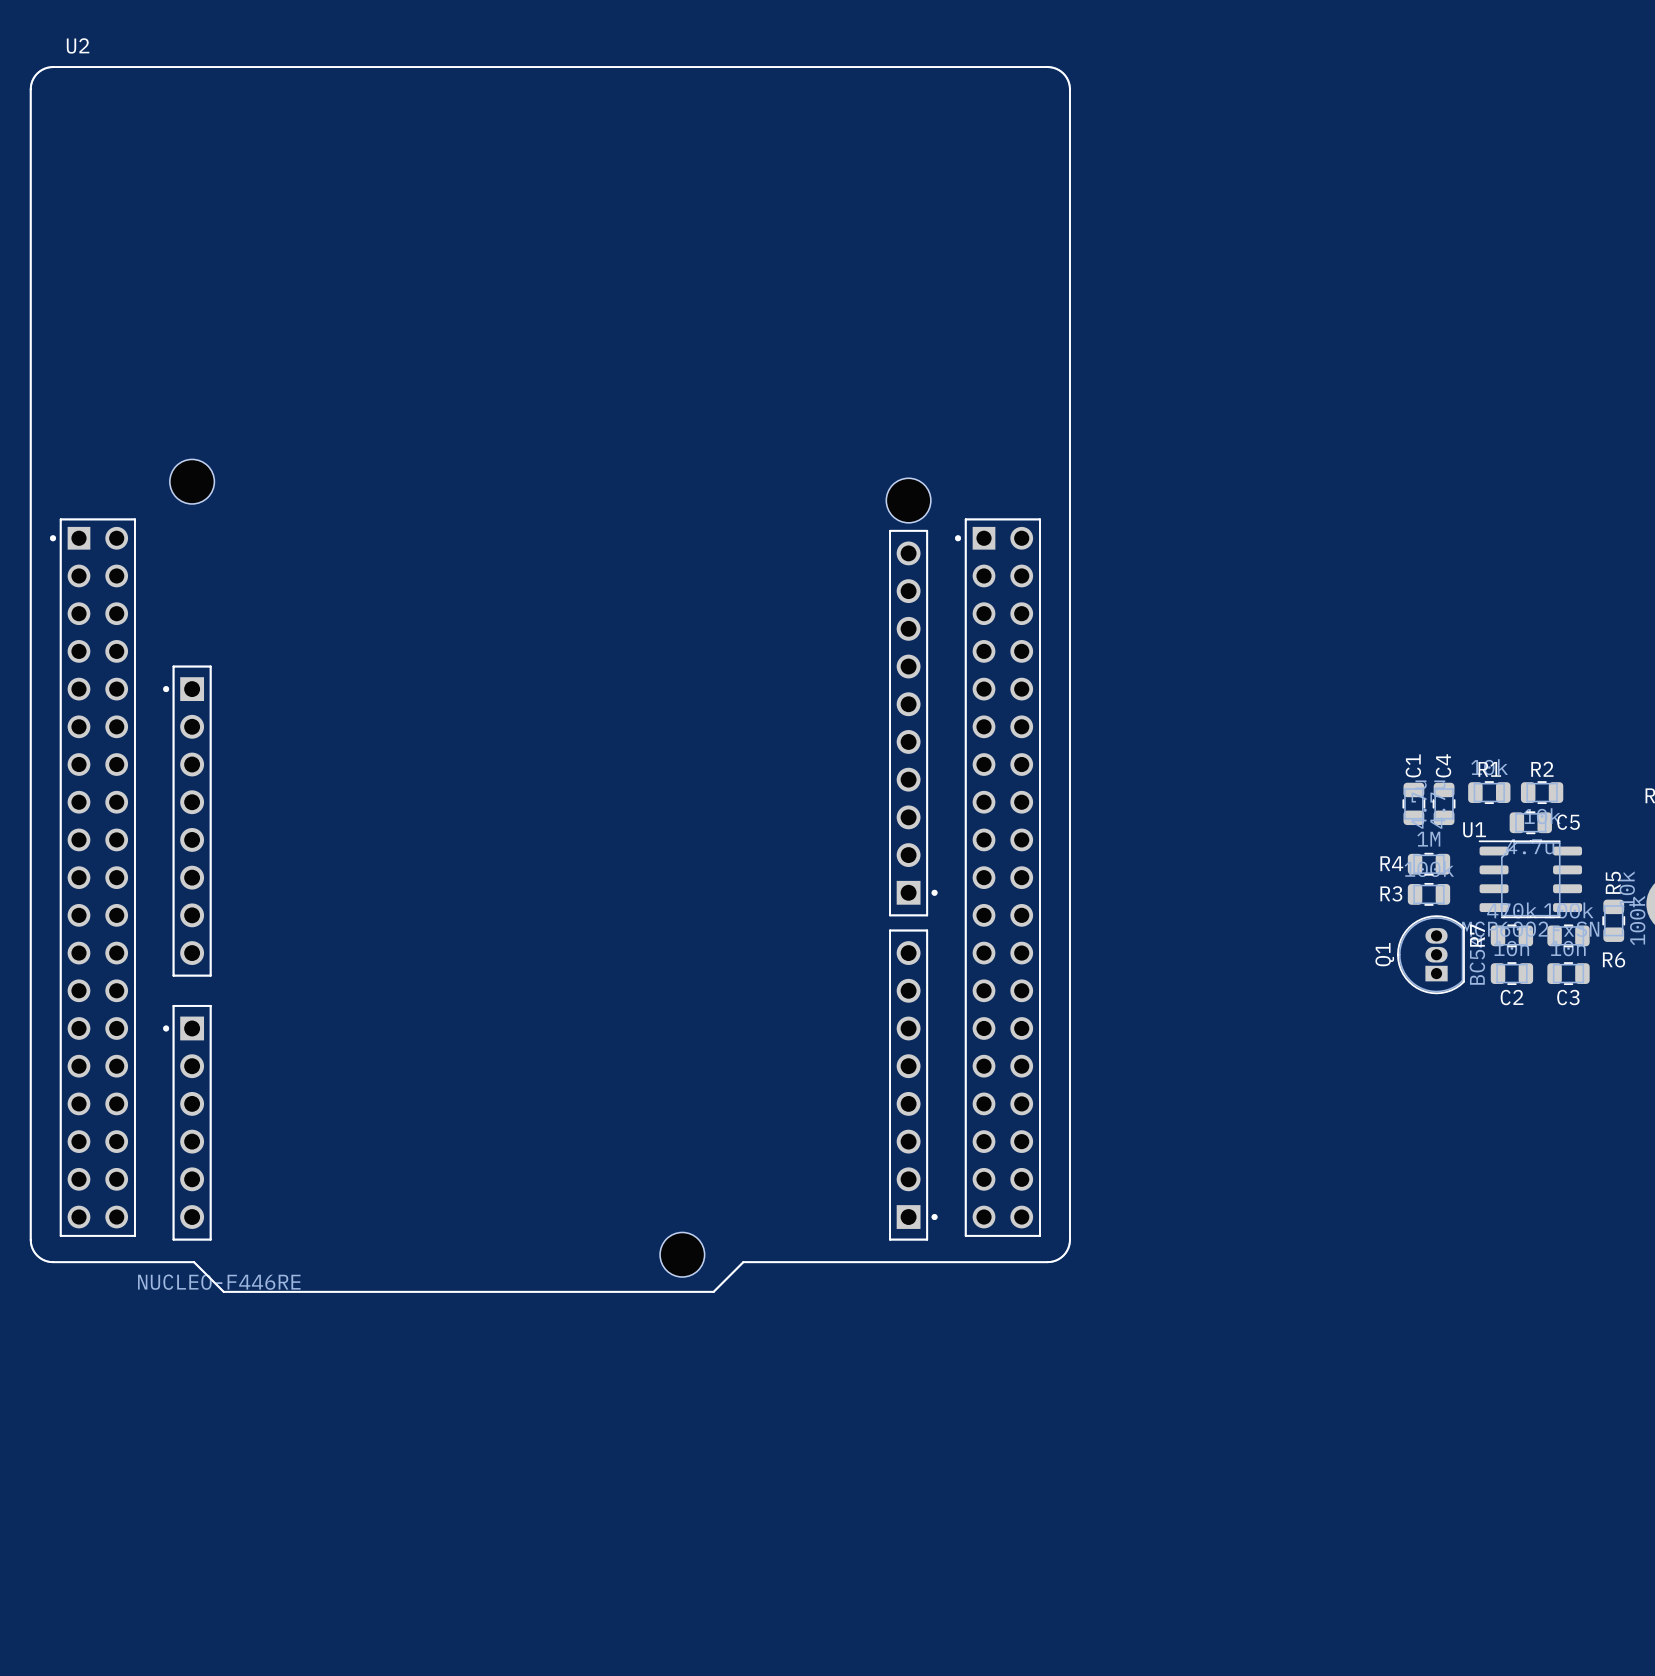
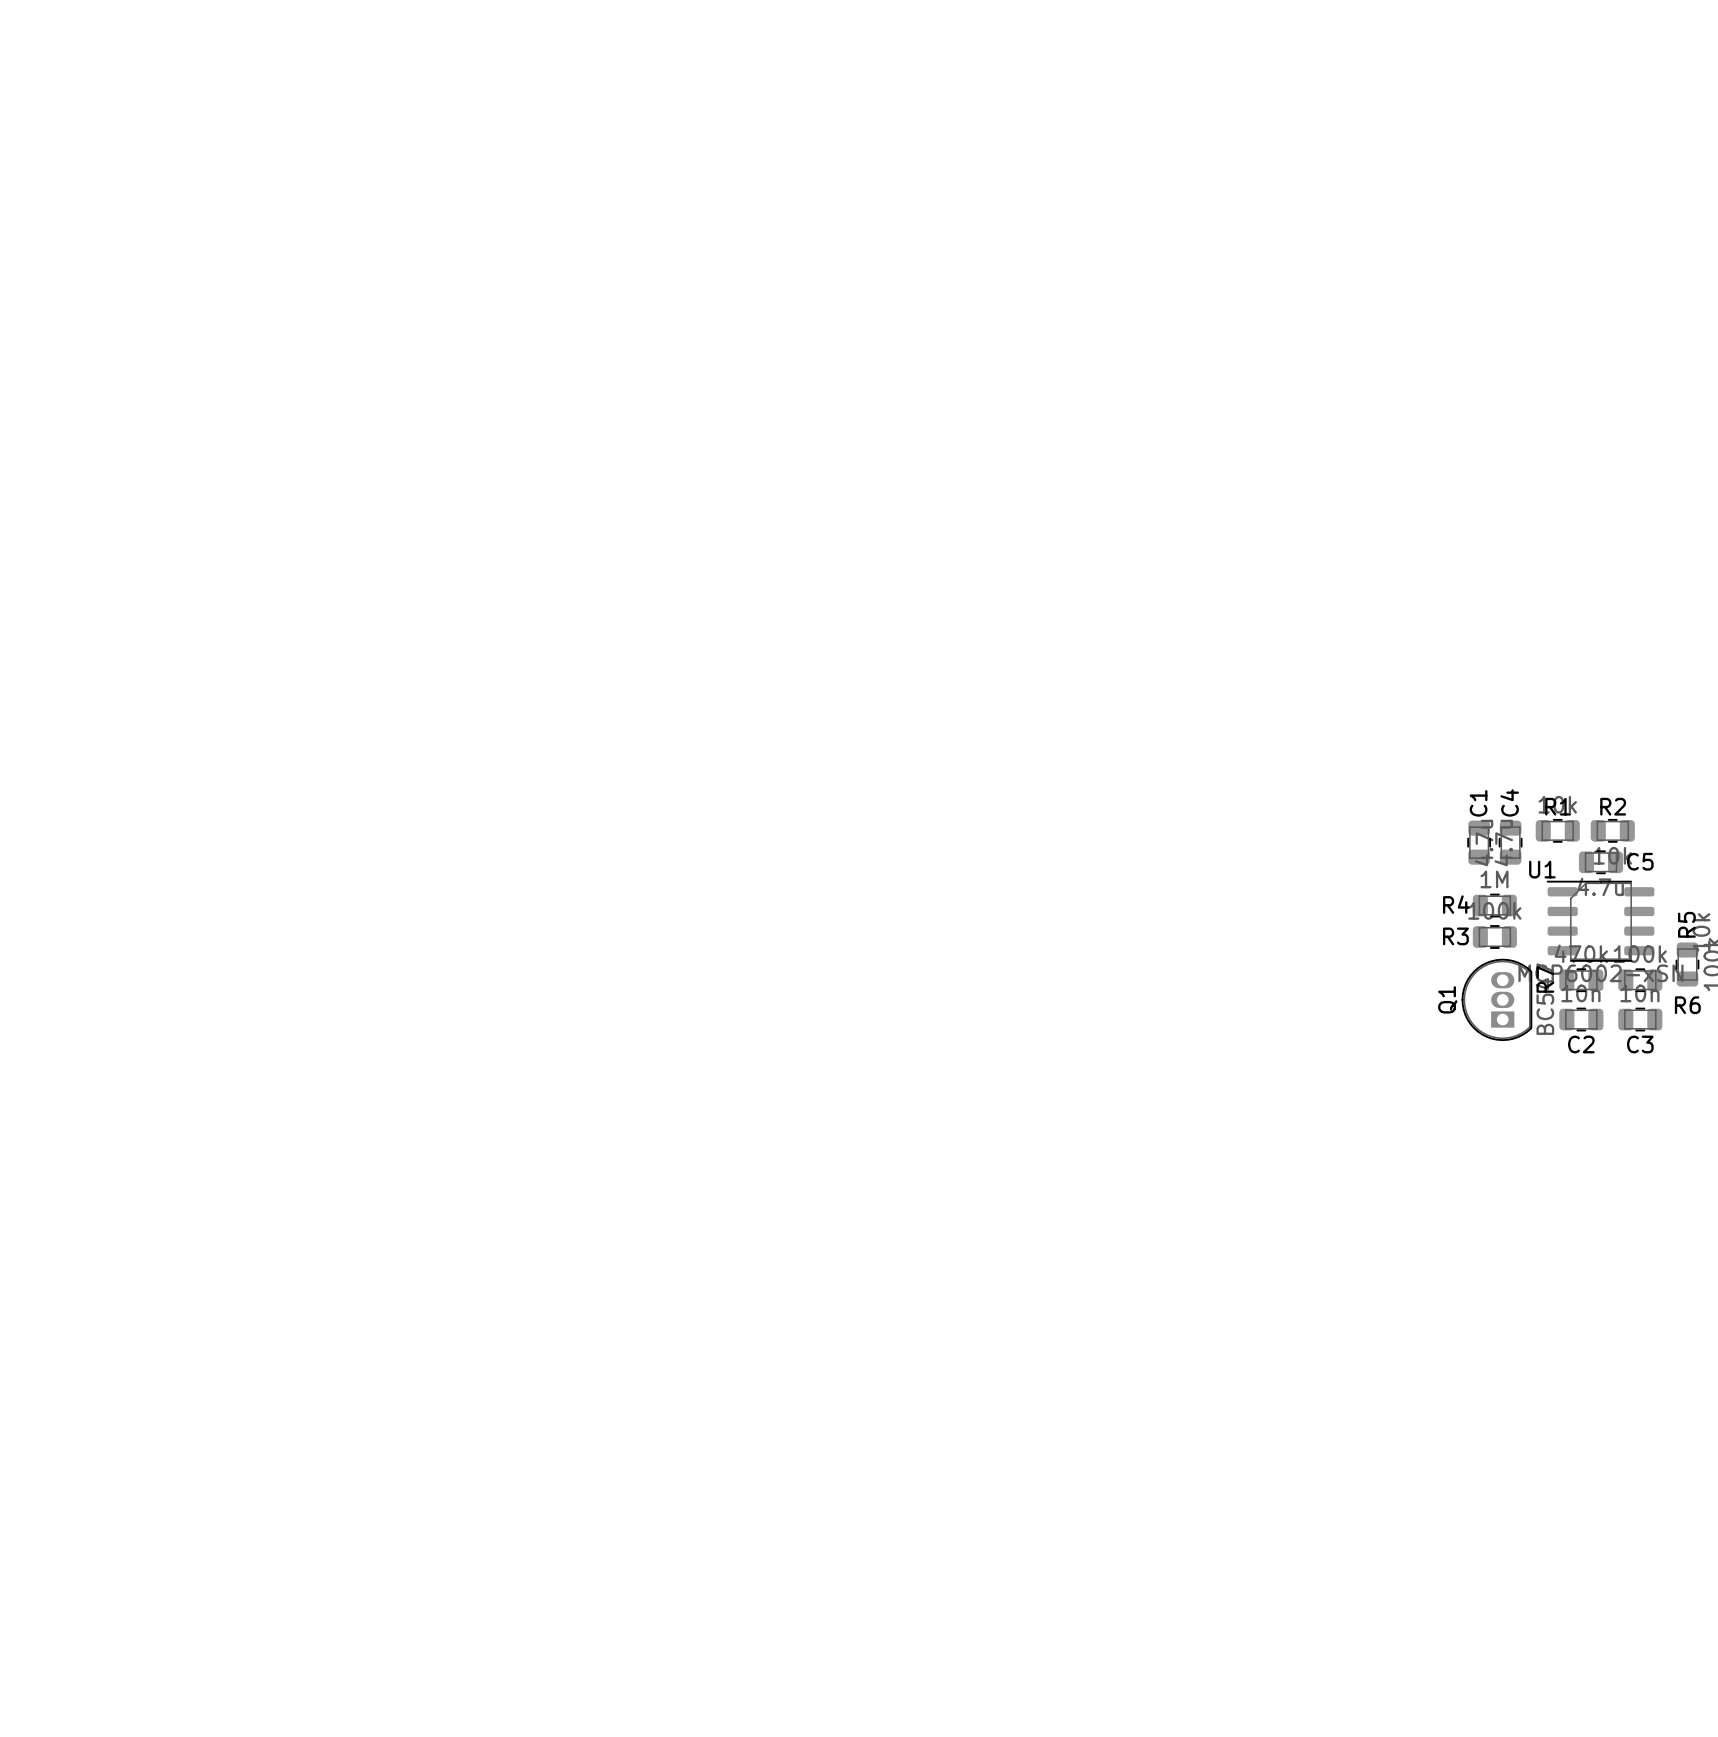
U2: NUCLEO-F446RE (550, 679) -> none

